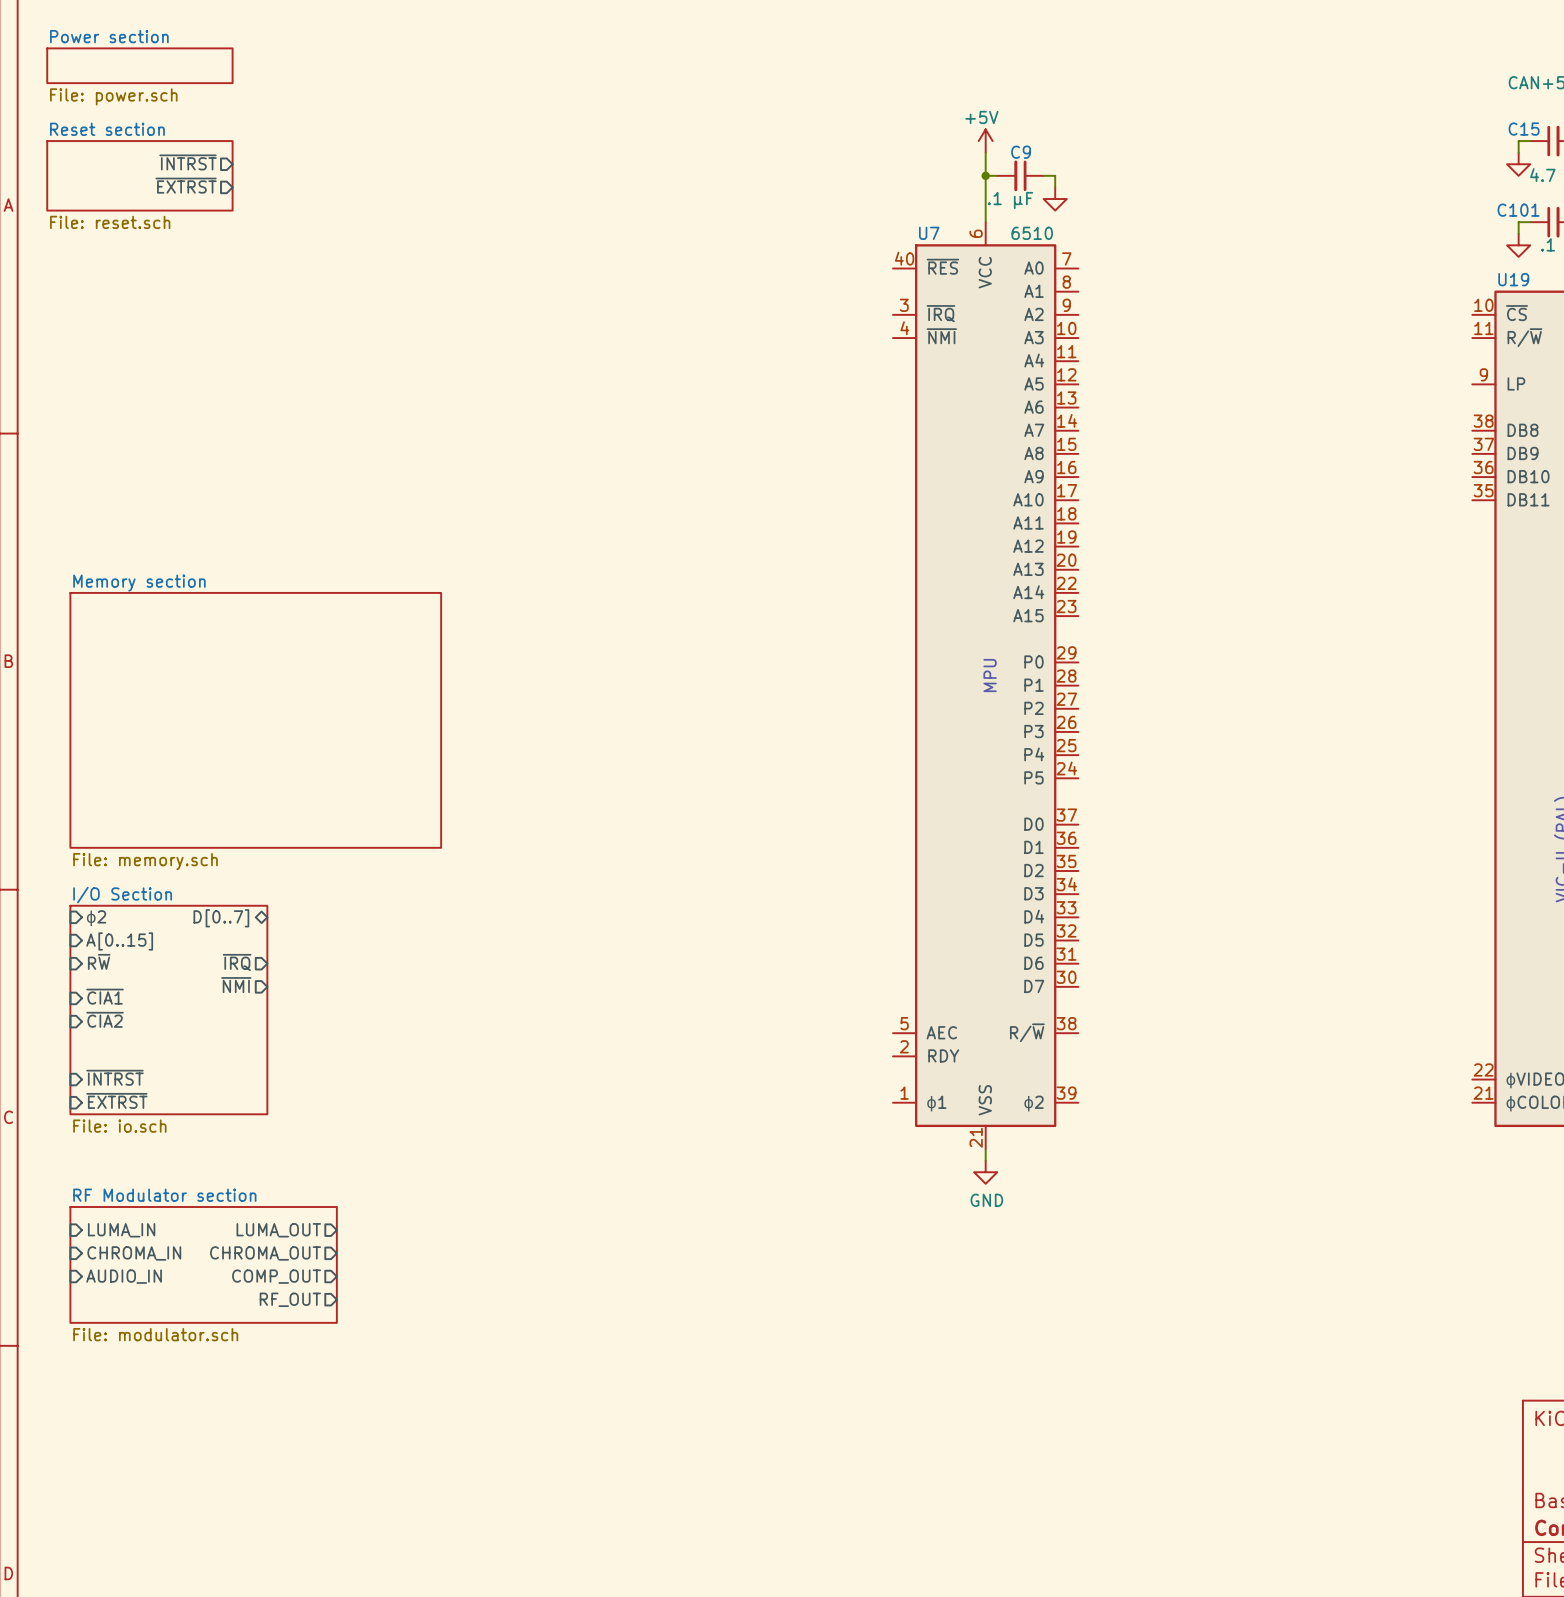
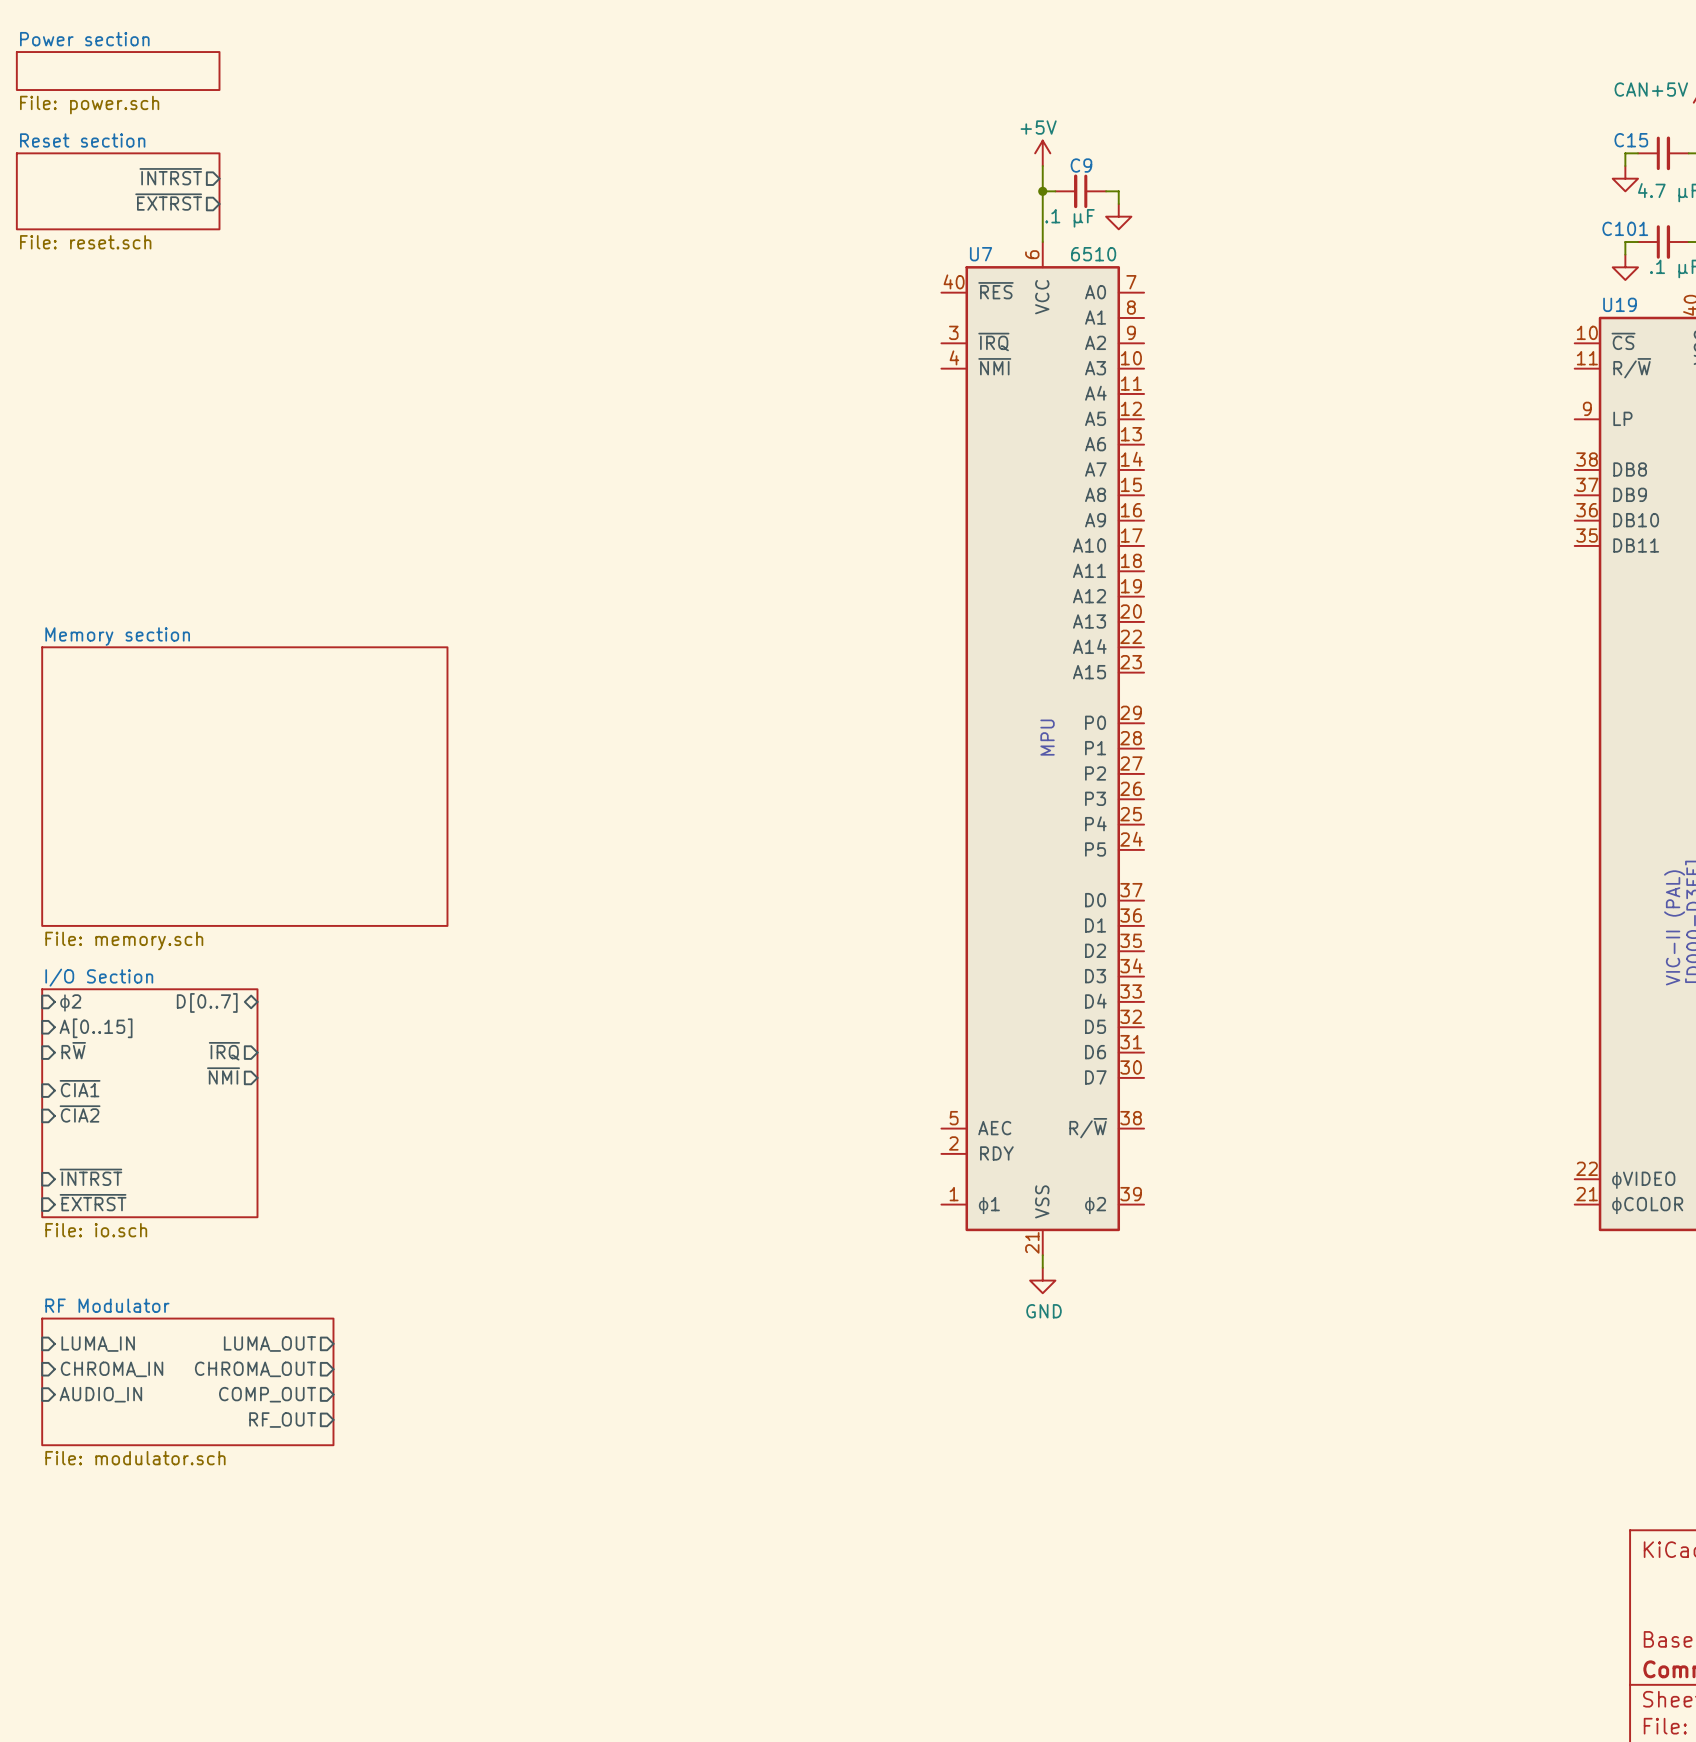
sheet RF Modulator section name: RF Modulator section (164, 1195) -> RF Modulator (107, 1305)

